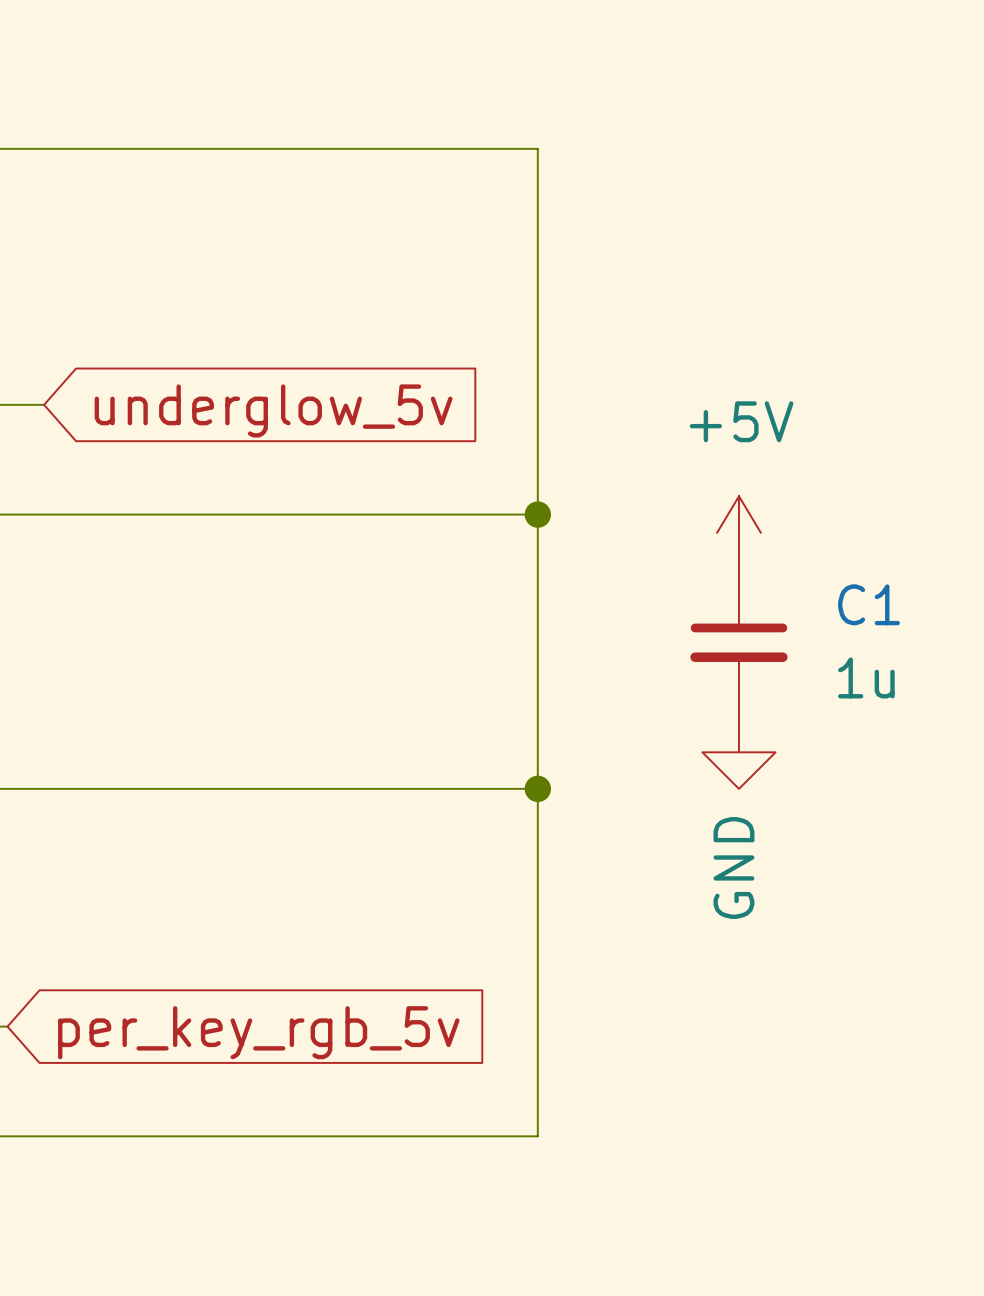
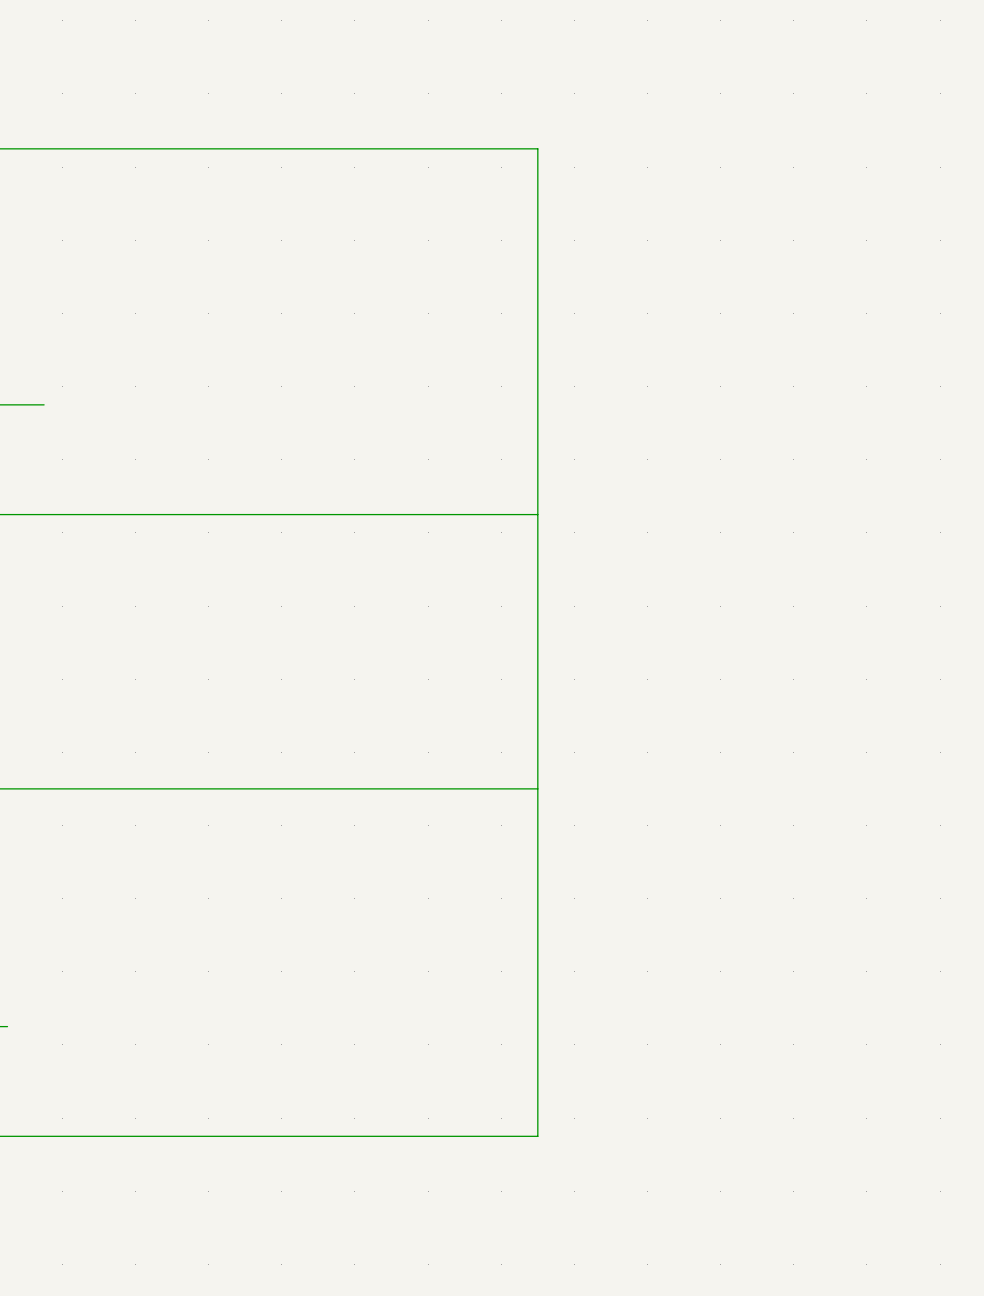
global label: underglow_5v (273, 410) -> none
junction: (537, 514) -> none
power symbol: +5V (738, 532) -> none
C1: 1u (738, 642) -> none
power symbol: GND (738, 752) -> none
junction: (537, 788) -> none
global label: per_key_rgb_5v (258, 1032) -> none

